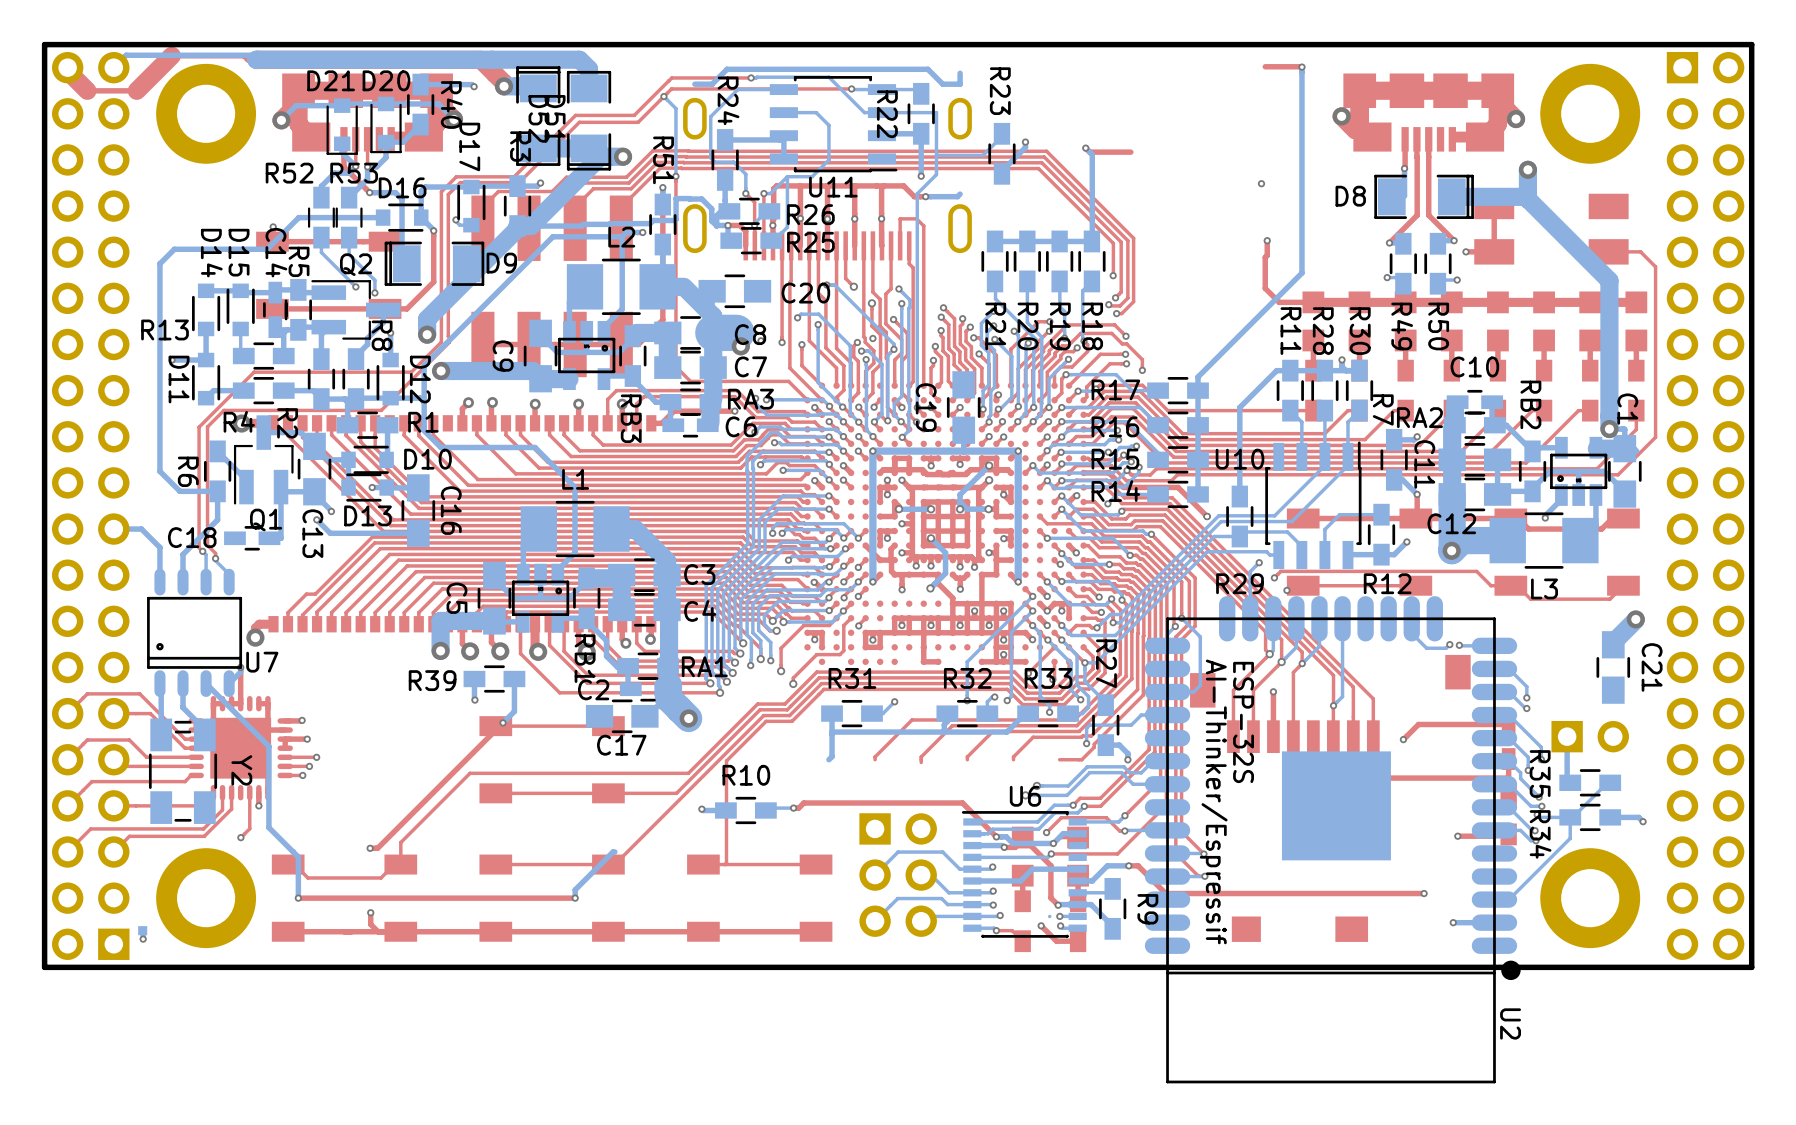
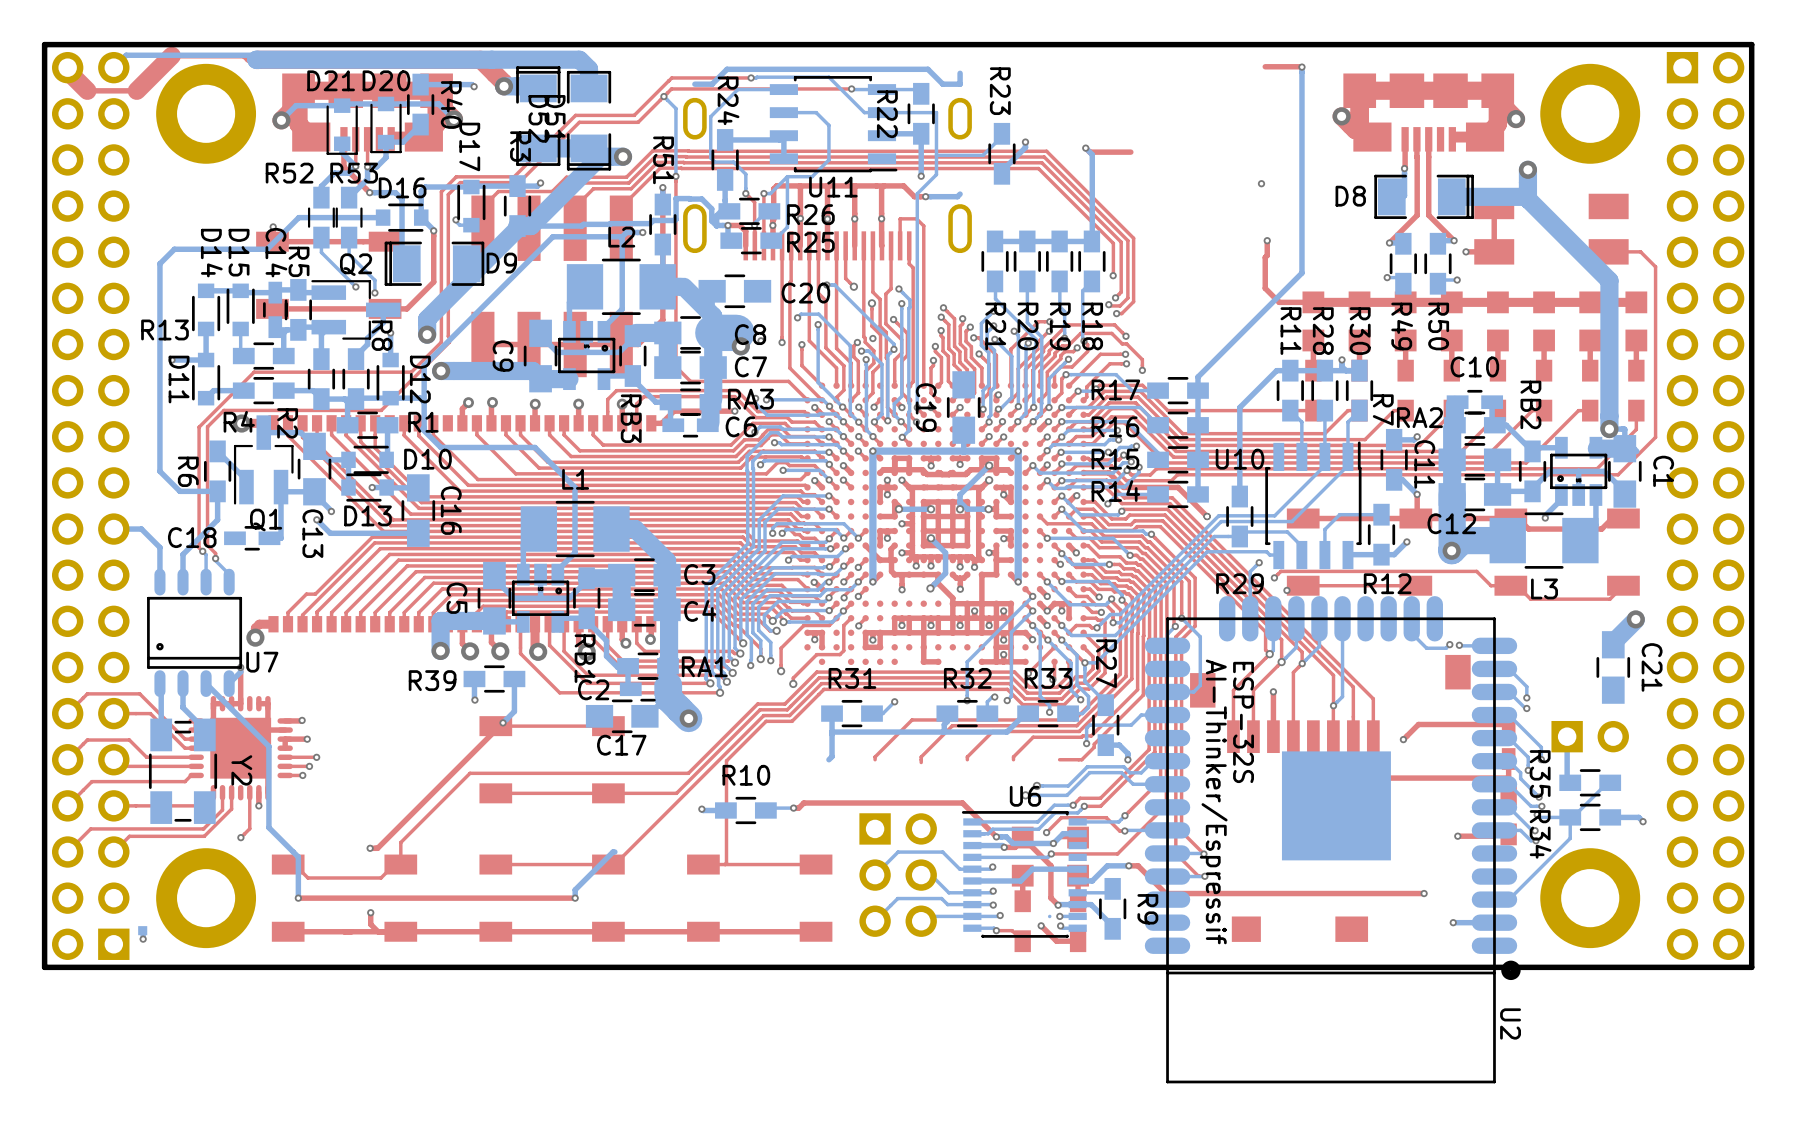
C1 name position: C1 (1627, 409) -> C1 (1663, 471)

